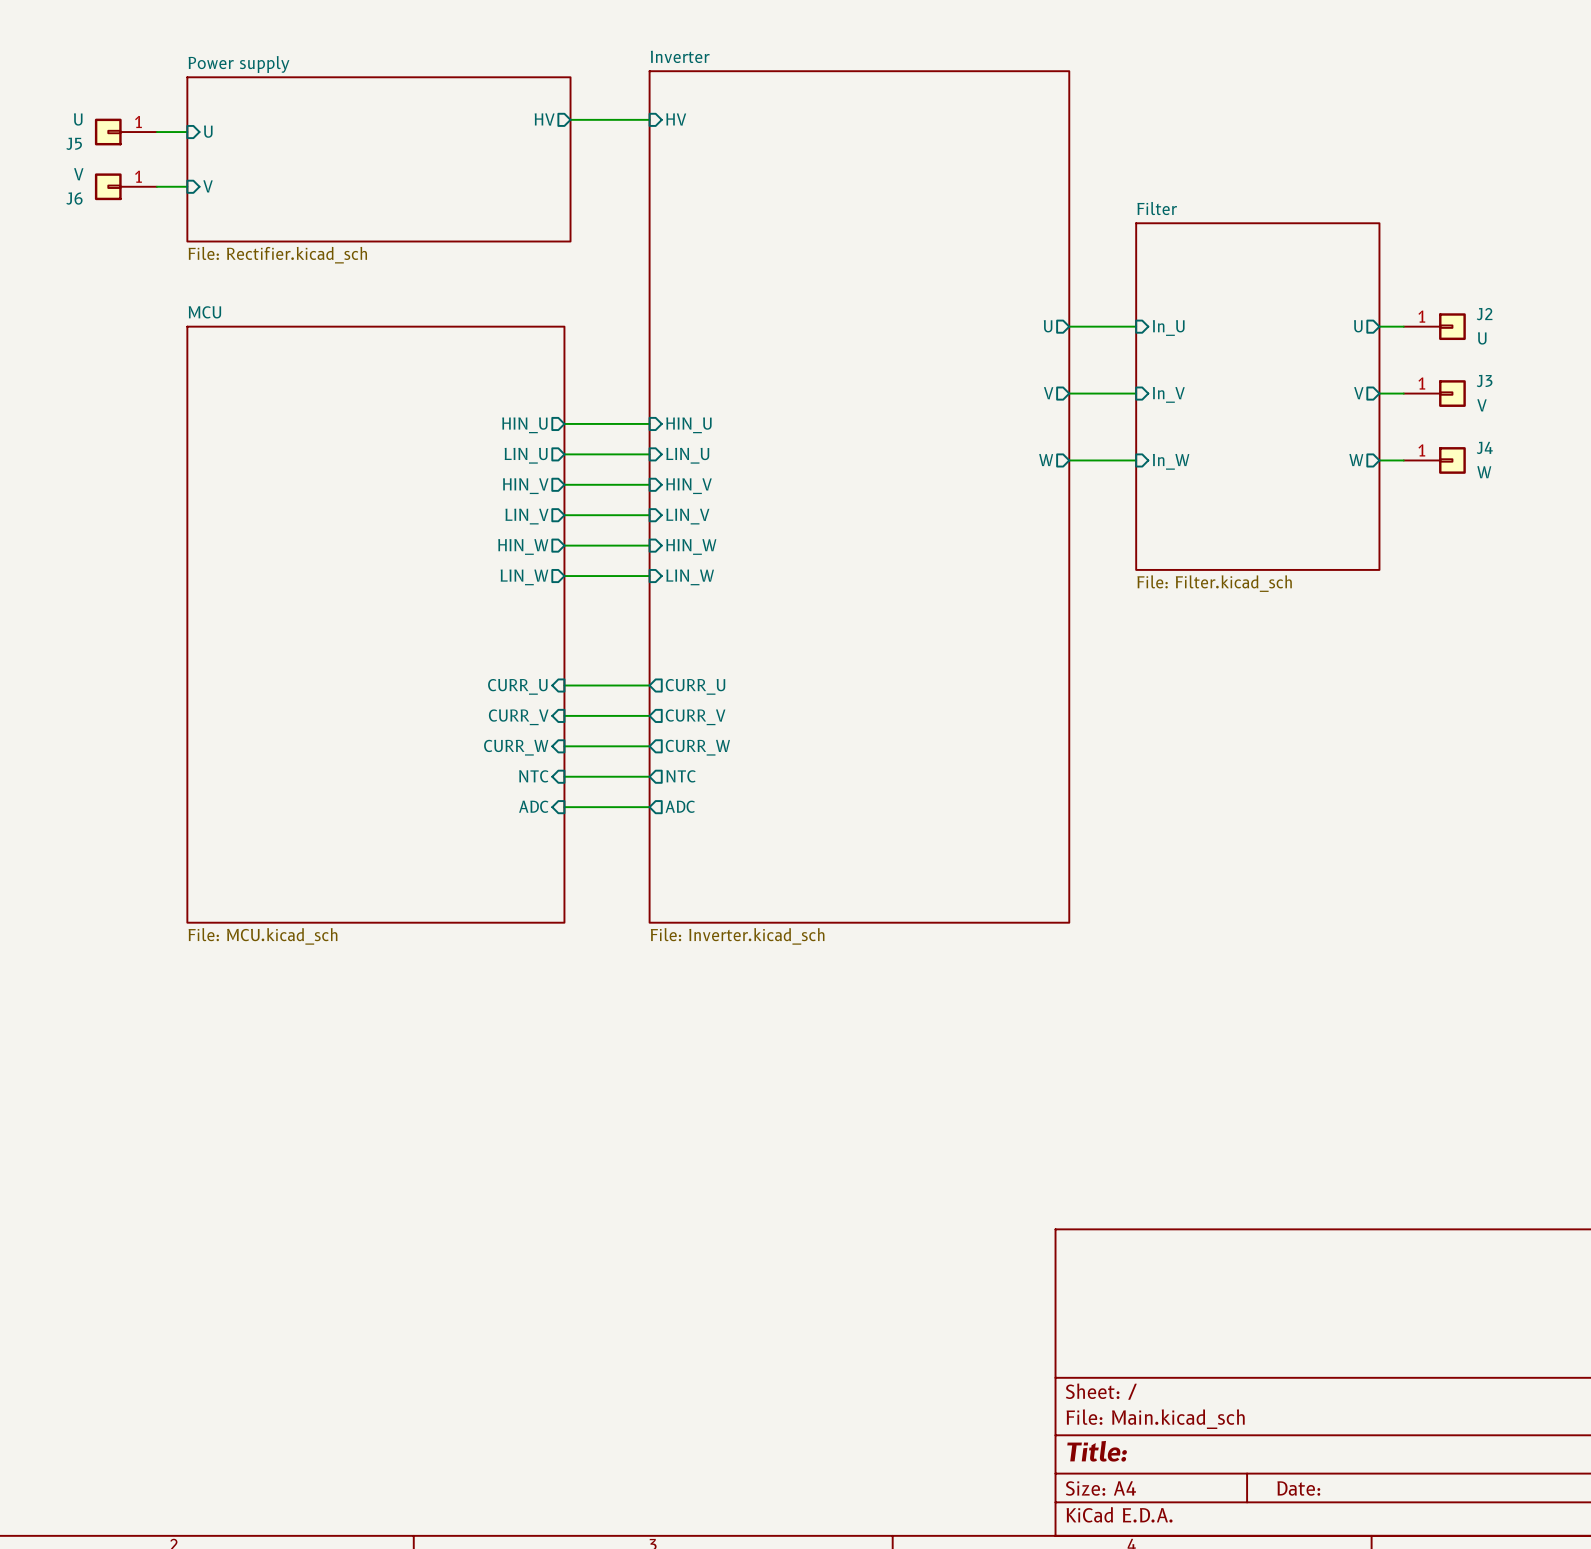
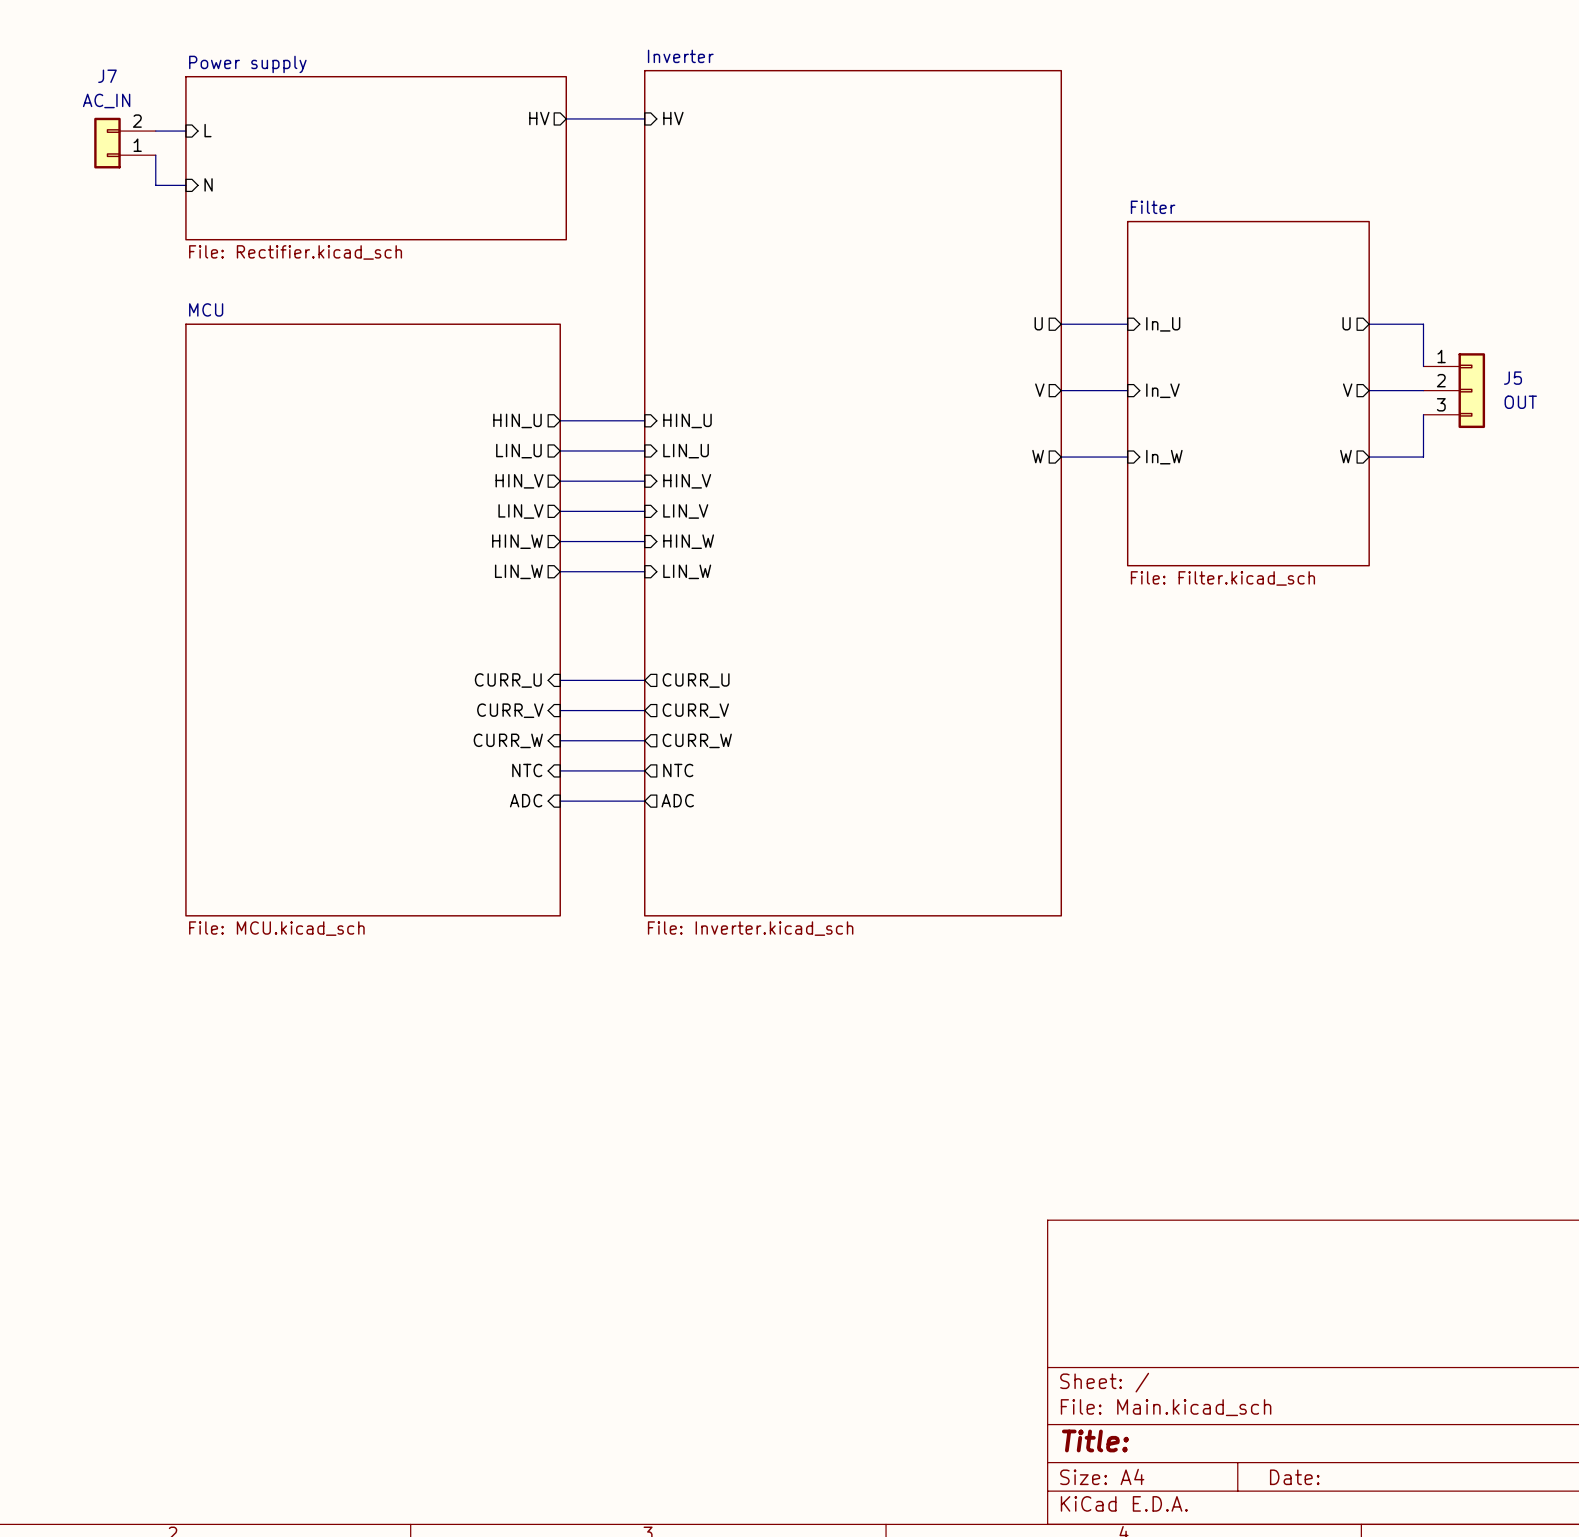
J5 symbol: [94, 118, 157, 146] -> [1423, 353, 1486, 429]
J5 value: U (78, 119) -> OUT (1520, 402)
sheet pin: U (208, 131) -> L (207, 130)
J5 name position: J5 (74, 143) -> J5 (1512, 378)
J7: none -> AC_IN (124, 143)
wire: none -> (155, 155) (155, 185)
J6: V (125, 186) -> none
sheet pin: V (208, 186) -> N (208, 184)
wire: none -> (1393, 324) (1423, 324) (1423, 366)
J2: U (1434, 326) -> none
J3: V (1434, 393) -> none
wire: none -> (1423, 414) (1423, 457) (1393, 457)
J4: W (1434, 460) -> none

